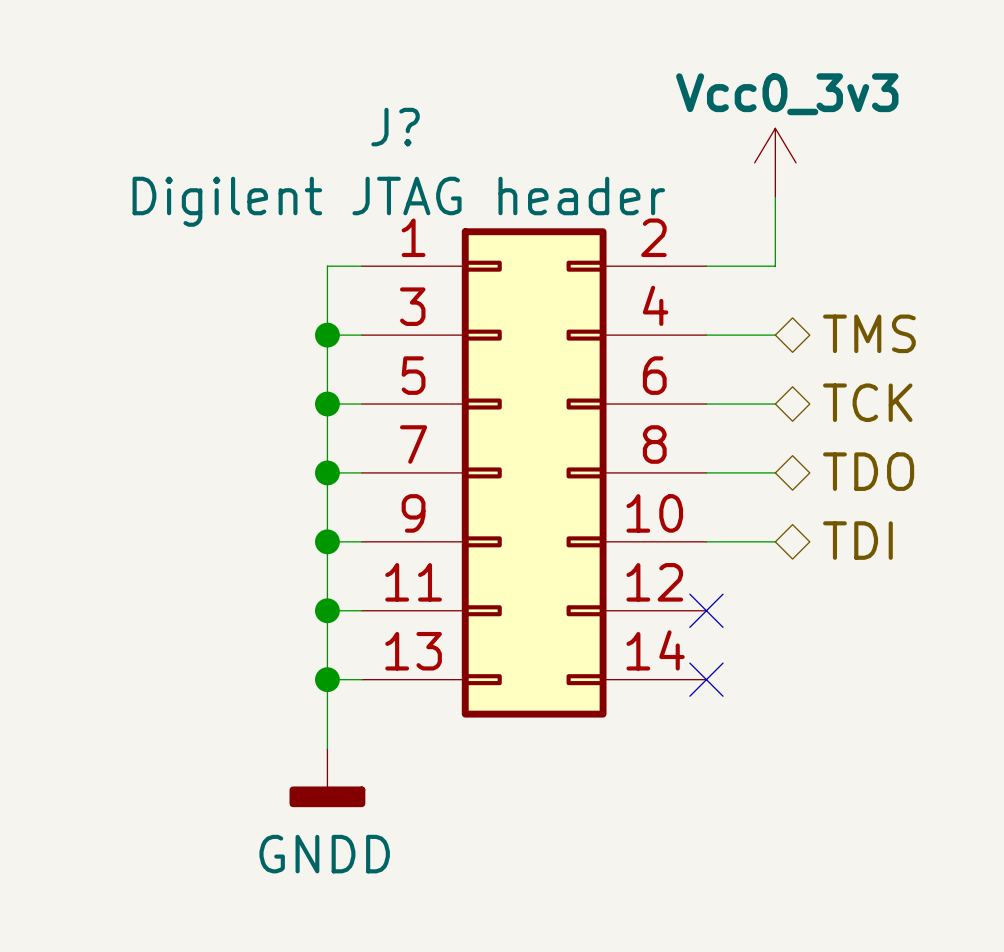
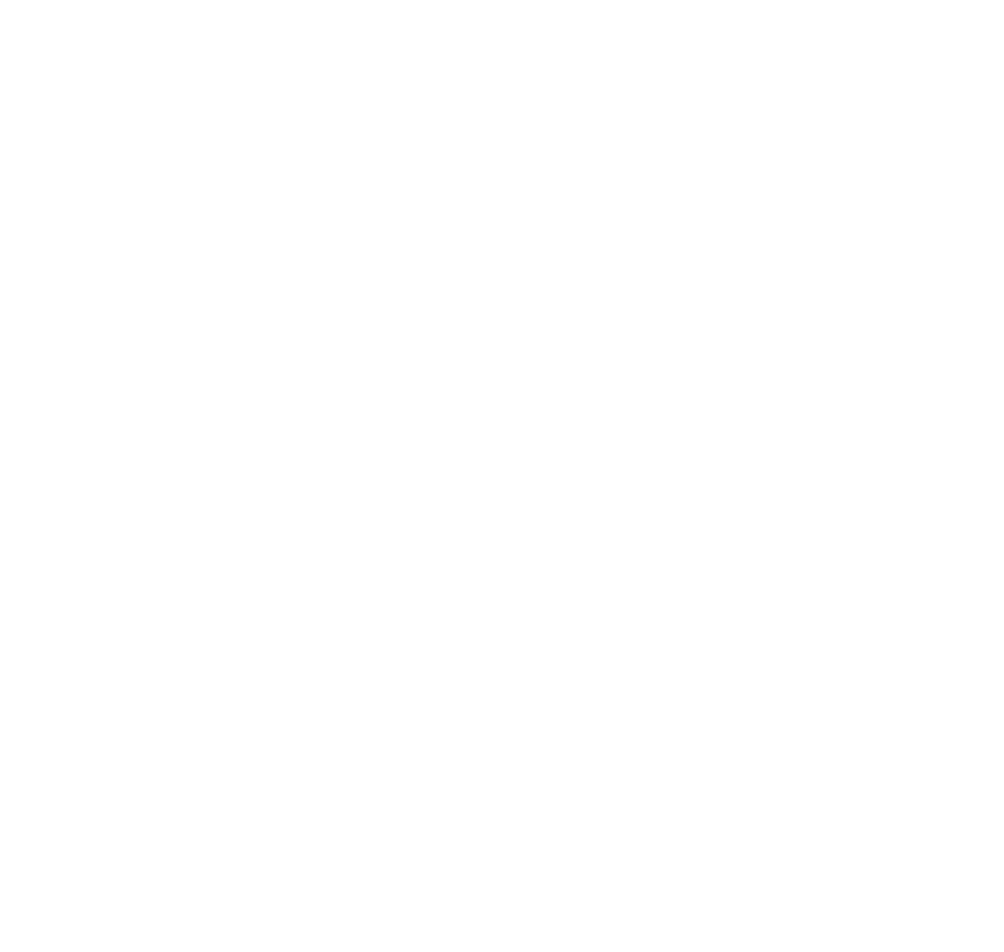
part: Vcc0_3v3 (775, 162) -> none
wire: (775, 197) (775, 266) (706, 266) -> none
wire: (361, 266) (327, 266) (327, 748) -> none
hierarchical label: TMS (869, 333) -> none
wire: (327, 335) (361, 335) -> none
junction: (327, 335) -> none
wire: (706, 335) (775, 335) -> none
hierarchical label: TCK (867, 402) -> none
wire: (327, 404) (361, 404) -> none
junction: (327, 404) -> none
wire: (706, 404) (775, 404) -> none
hierarchical label: TDO (868, 471) -> none
wire: (327, 472) (361, 472) -> none
junction: (327, 472) -> none
J?: Digilent JTAG header (534, 472) -> none
wire: (706, 472) (775, 472) -> none
hierarchical label: TDI (857, 540) -> none
wire: (327, 541) (361, 541) -> none
junction: (327, 541) -> none
wire: (706, 541) (775, 541) -> none
wire: (327, 610) (361, 610) -> none
junction: (327, 610) -> none
no-connect mark: (706, 610) -> none
wire: (327, 679) (361, 679) -> none
junction: (327, 679) -> none
no-connect mark: (706, 679) -> none
power symbol: GNDD (327, 777) -> none

